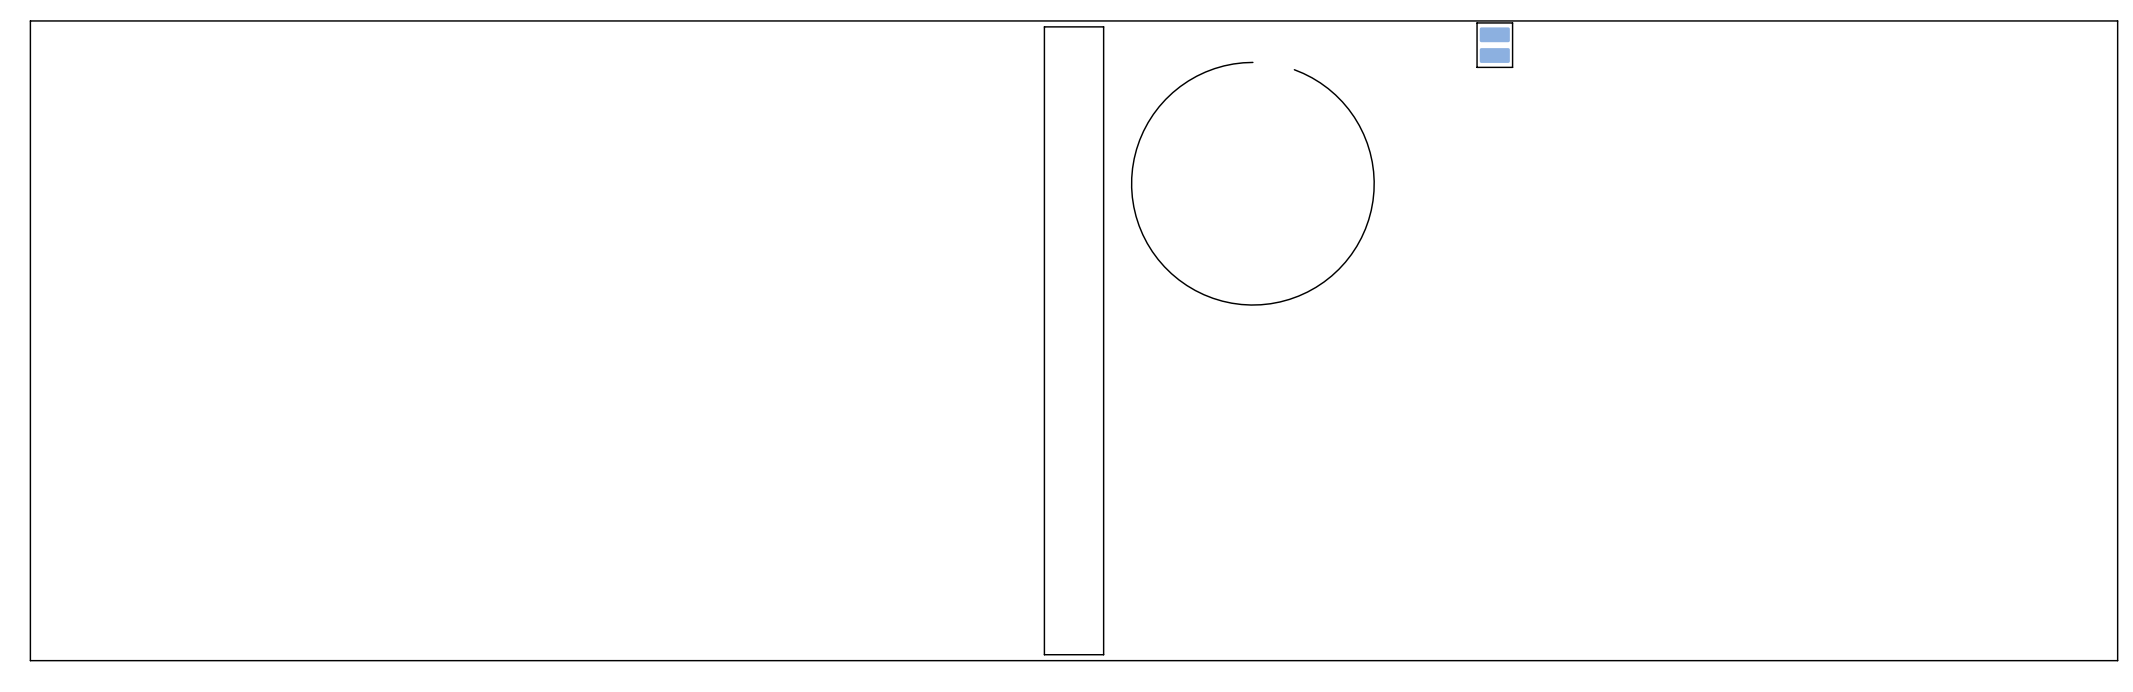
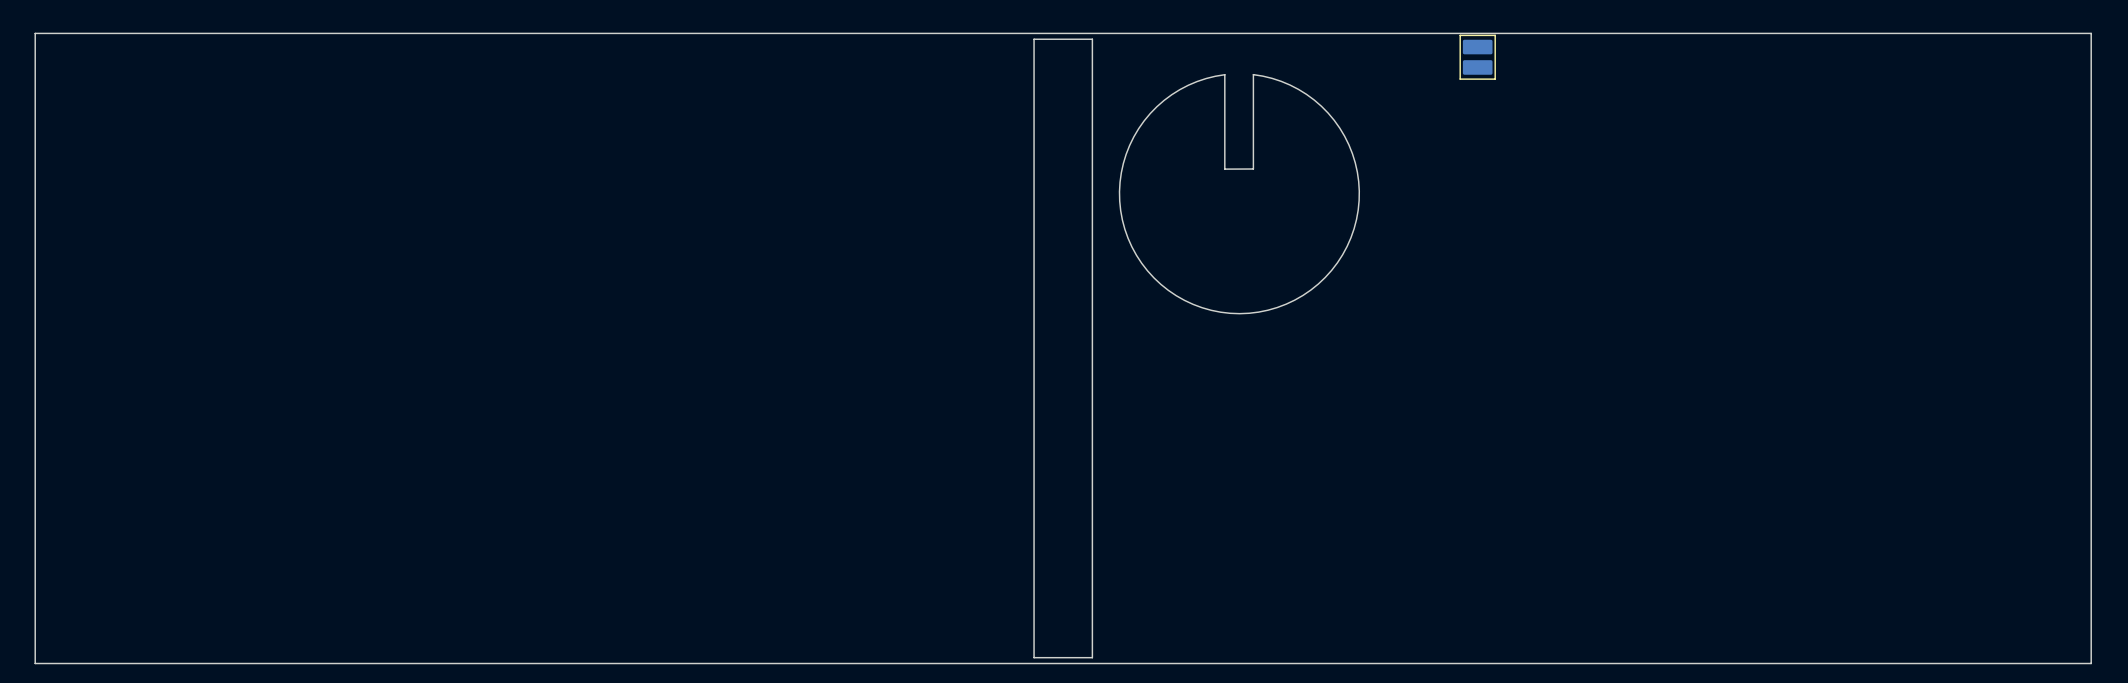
board edge: (1252, 62) (1223, 65) (1205, 72) (1188, 81) (1172, 92) (1153, 114) (1143, 131) (1136, 149) (1132, 168) (1131, 187) (1133, 207) (1142, 234) (1152, 251) (1171, 273) (1186, 285) (1213, 298) (1231, 303) (1251, 305) (1280, 301) (1298, 296) (1316, 287) (1338, 269) (1351, 254) (1365, 228) (1371, 210) (1374, 181) (1372, 162) (1367, 143) (1359, 125) (1342, 101) (1328, 88) (1312, 77) (1294, 69) -> none
board edge: none -> (1253, 74) (1253, 169) (1224, 169) (1224, 74) (1206, 78) (1188, 85) (1171, 94) (1156, 106) (1144, 120) (1133, 136) (1126, 154) (1121, 172) (1119, 201) (1122, 220) (1131, 246) (1141, 263) (1153, 277) (1176, 295) (1193, 304) (1220, 312) (1239, 313) (1268, 310) (1294, 300) (1310, 290) (1331, 270) (1342, 254) (1354, 228) (1358, 210) (1359, 191) (1355, 162) (1344, 136) (1334, 120) (1321, 106) (1298, 89) (1281, 81) (1253, 74)

